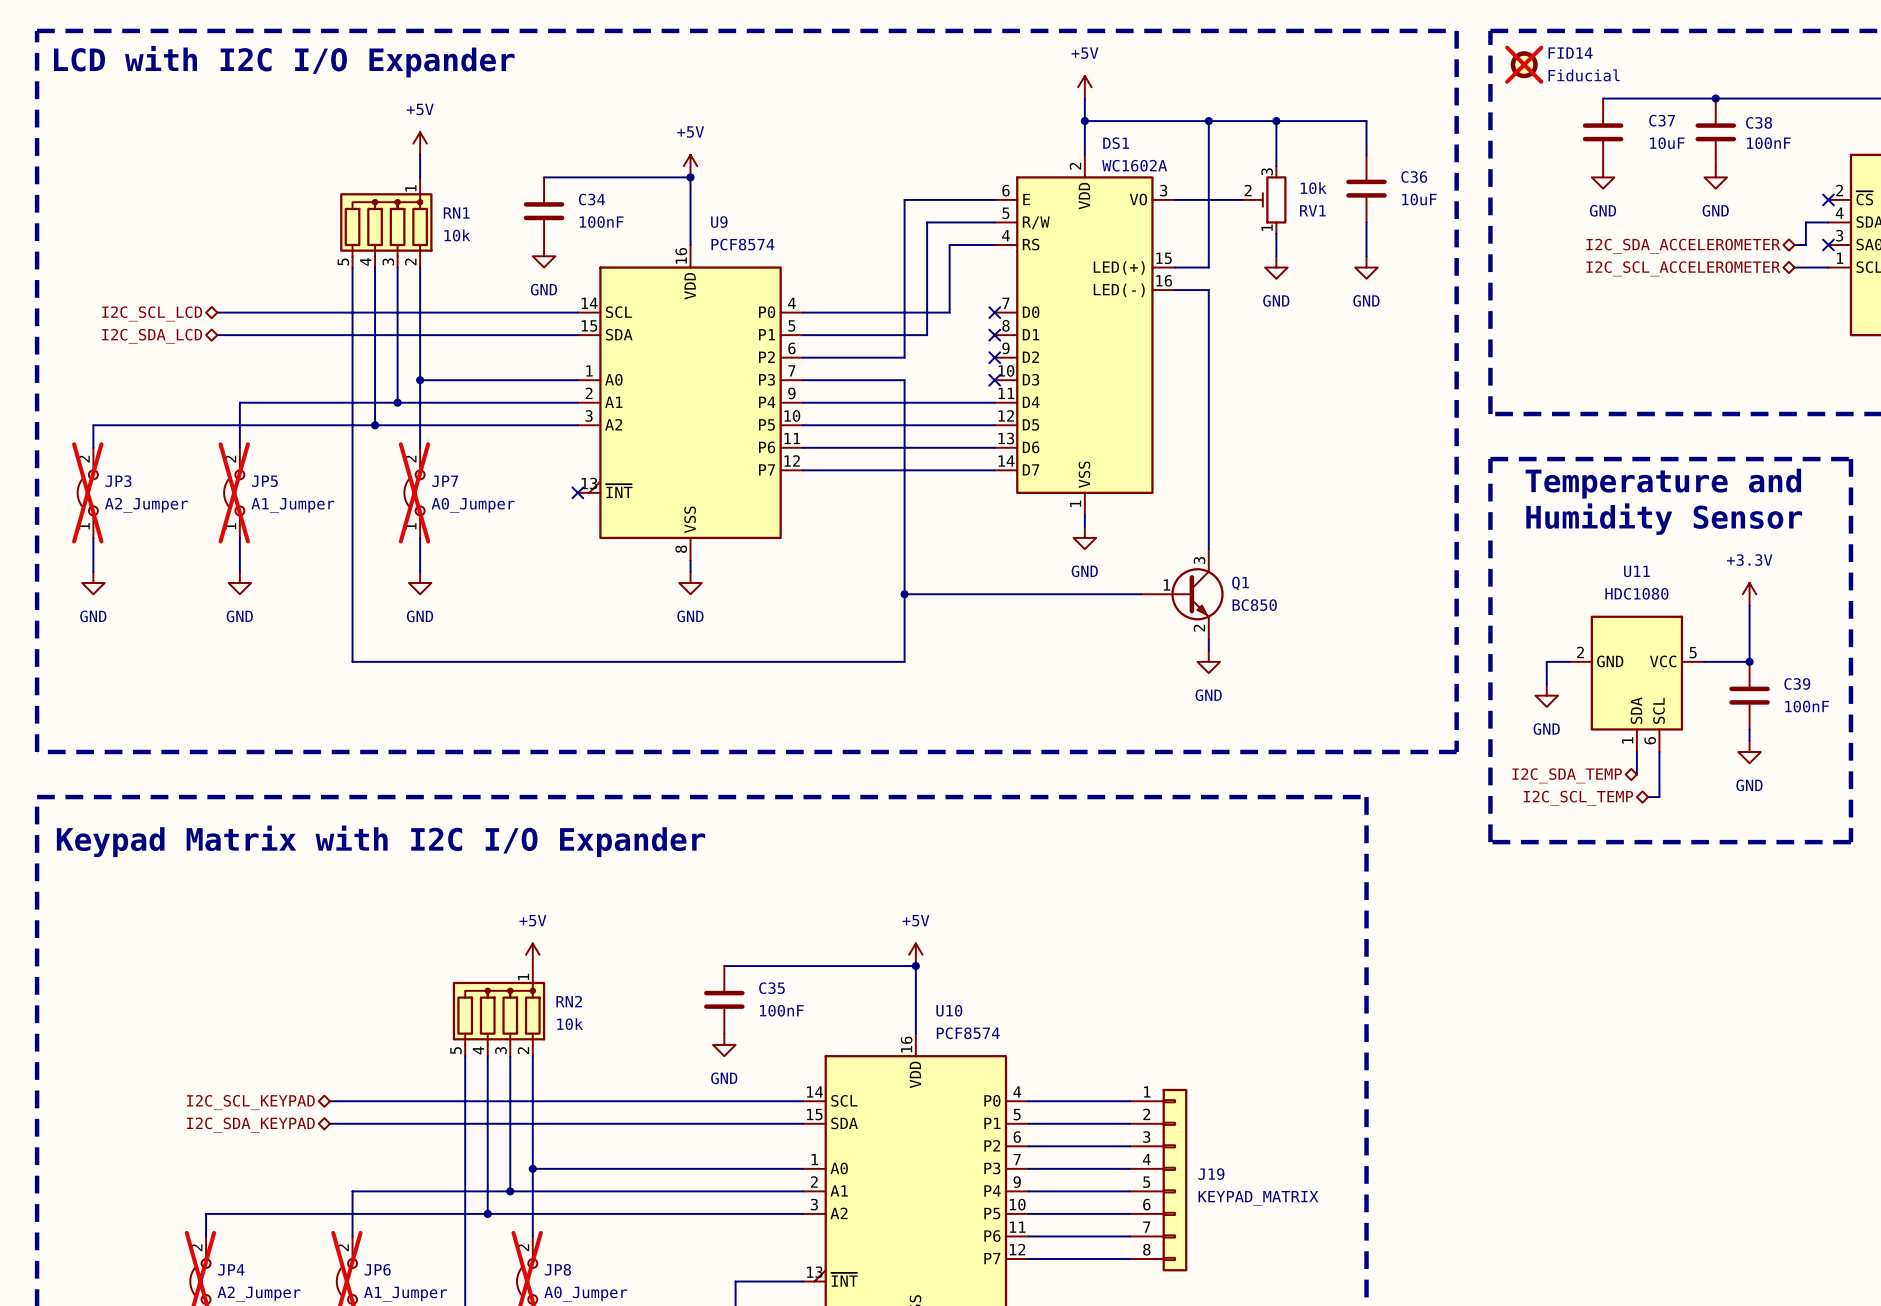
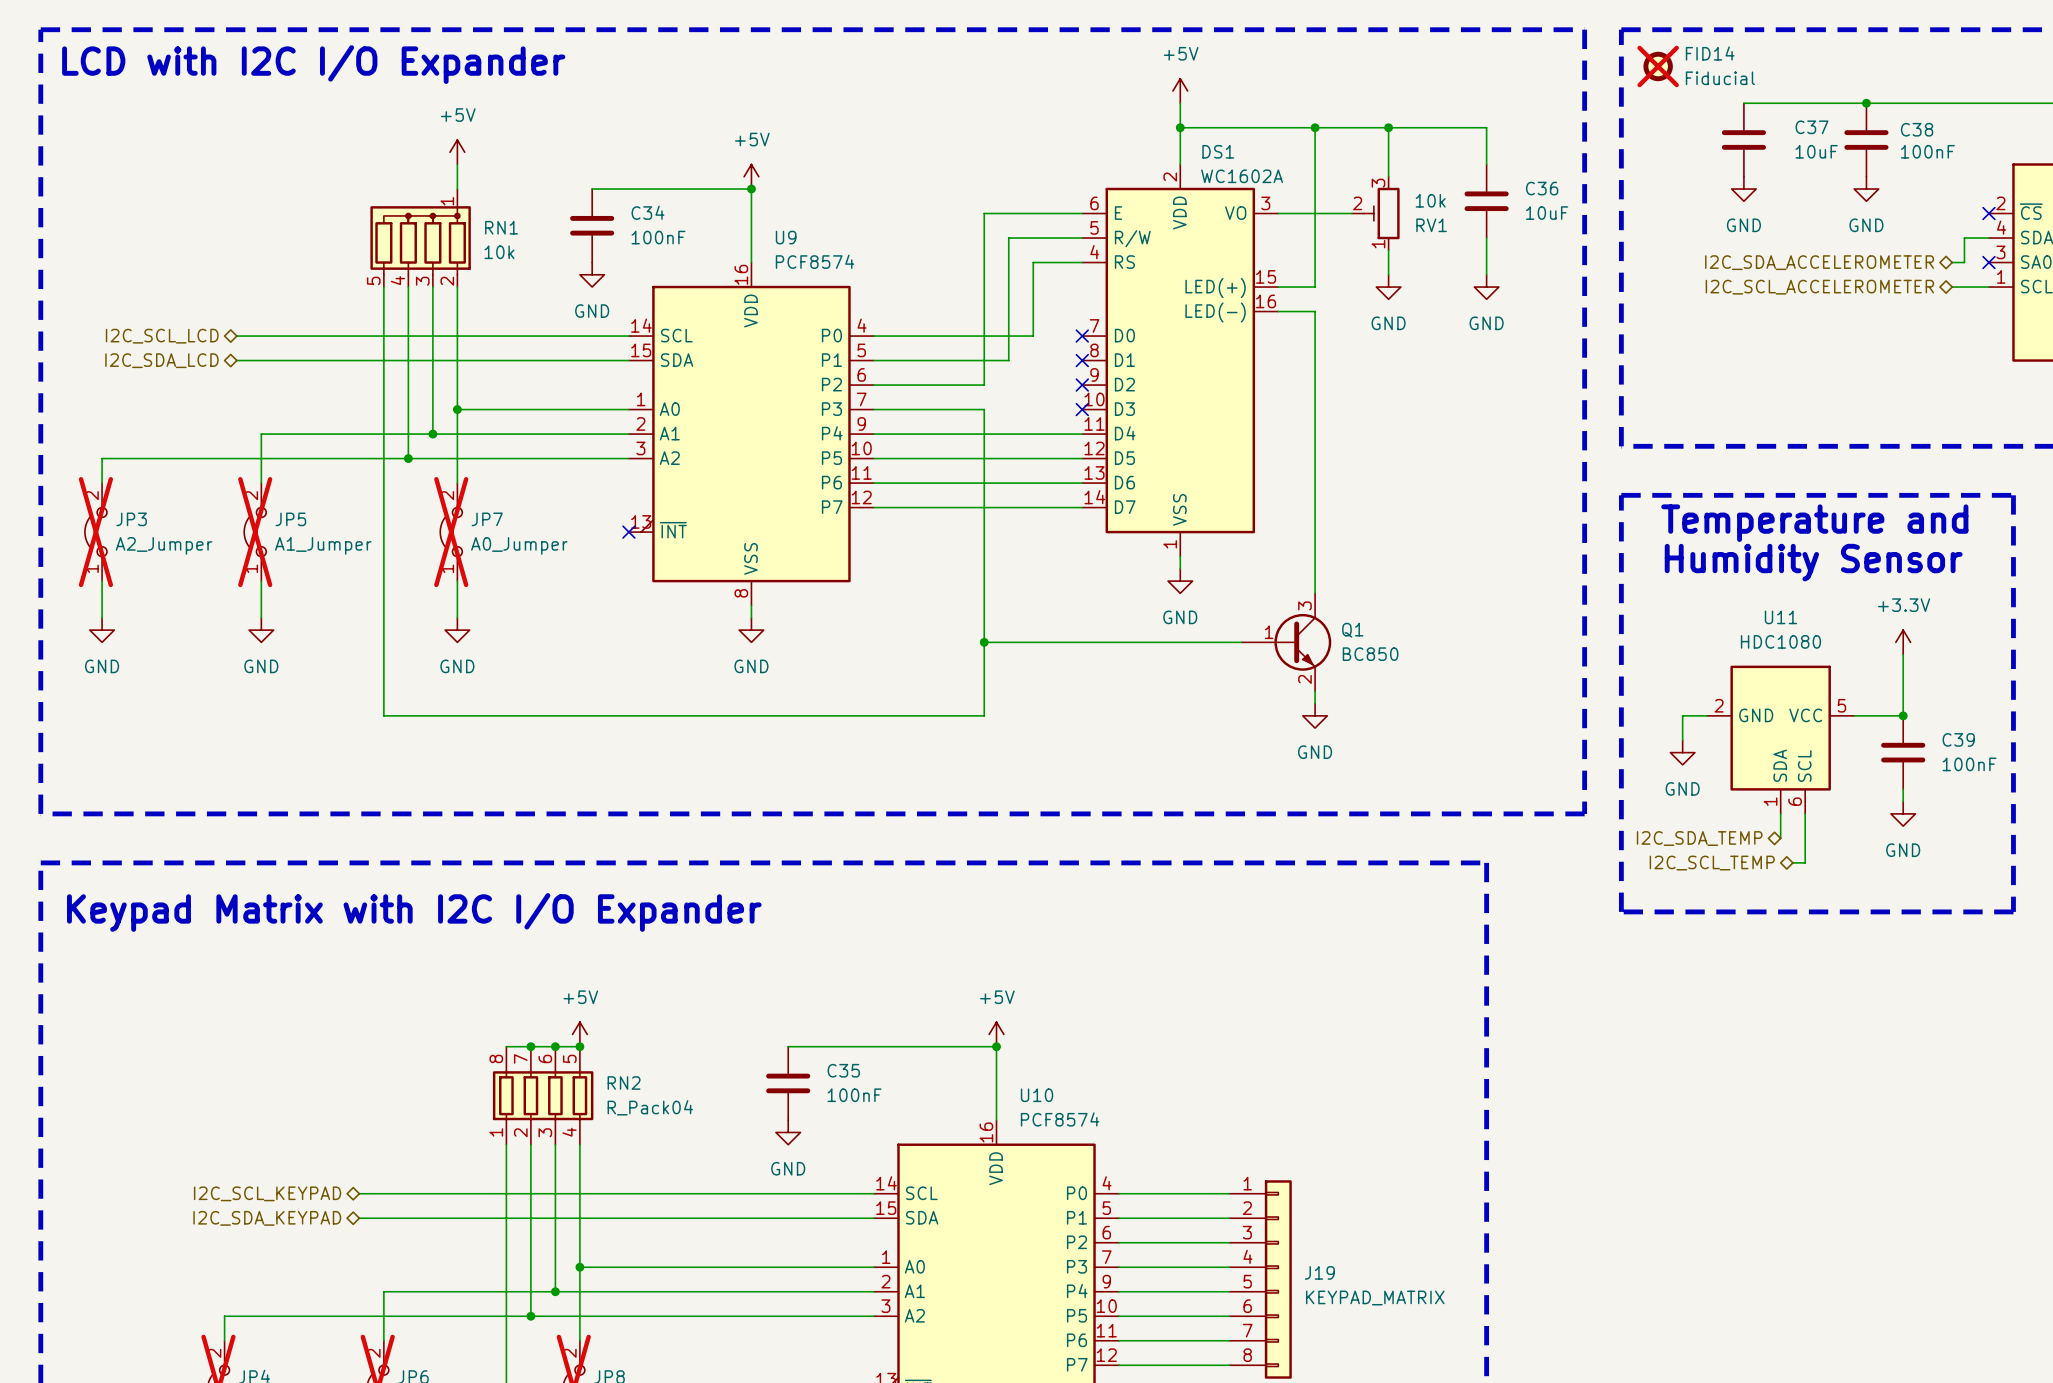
RN2 symbol: [452, 966, 546, 1057] -> [492, 1046, 594, 1145]
wire: none -> (506, 1046) (579, 1046)
junction: none -> (530, 1046)
junction: none -> (555, 1046)
junction: none -> (579, 1046)
RN2 value: 10k (570, 1024) -> R_Pack04 (650, 1107)

